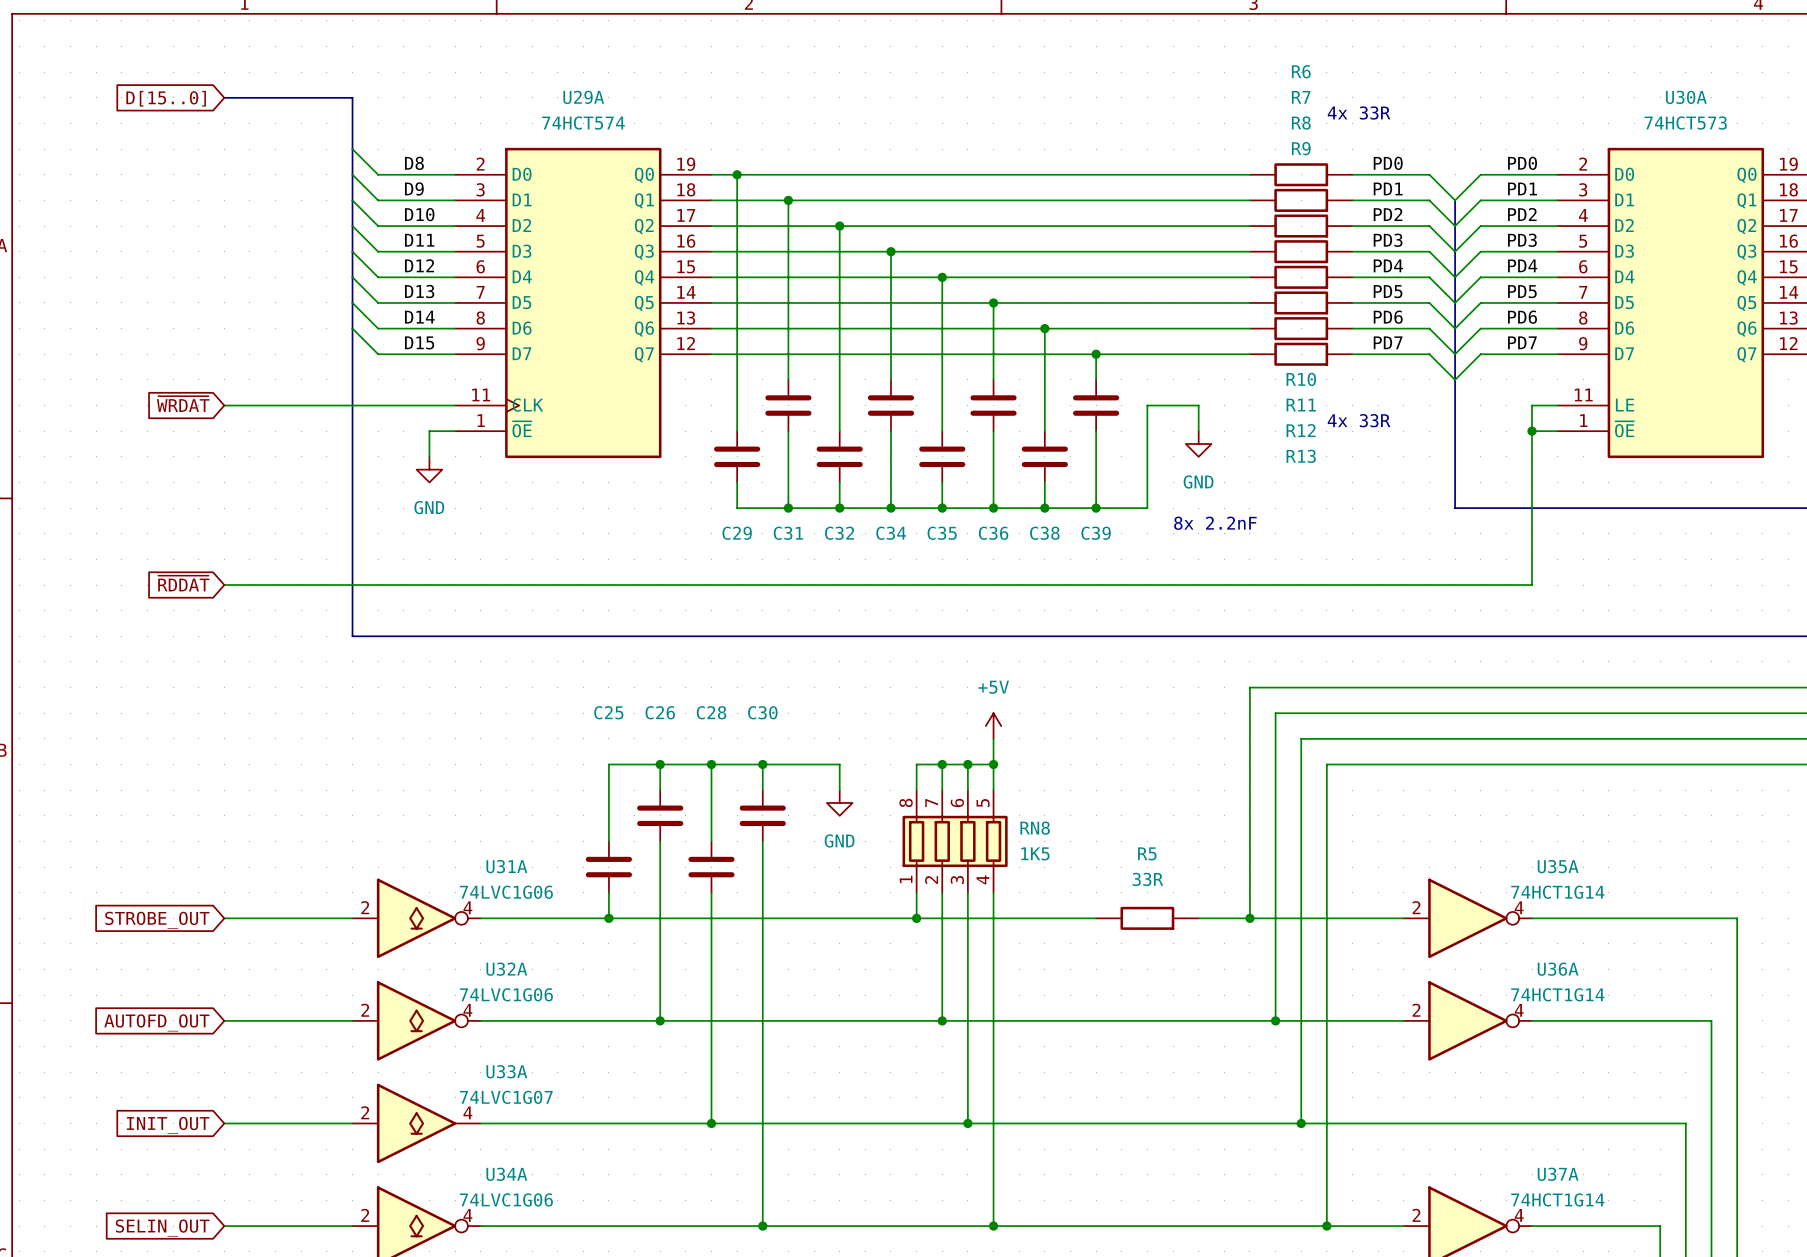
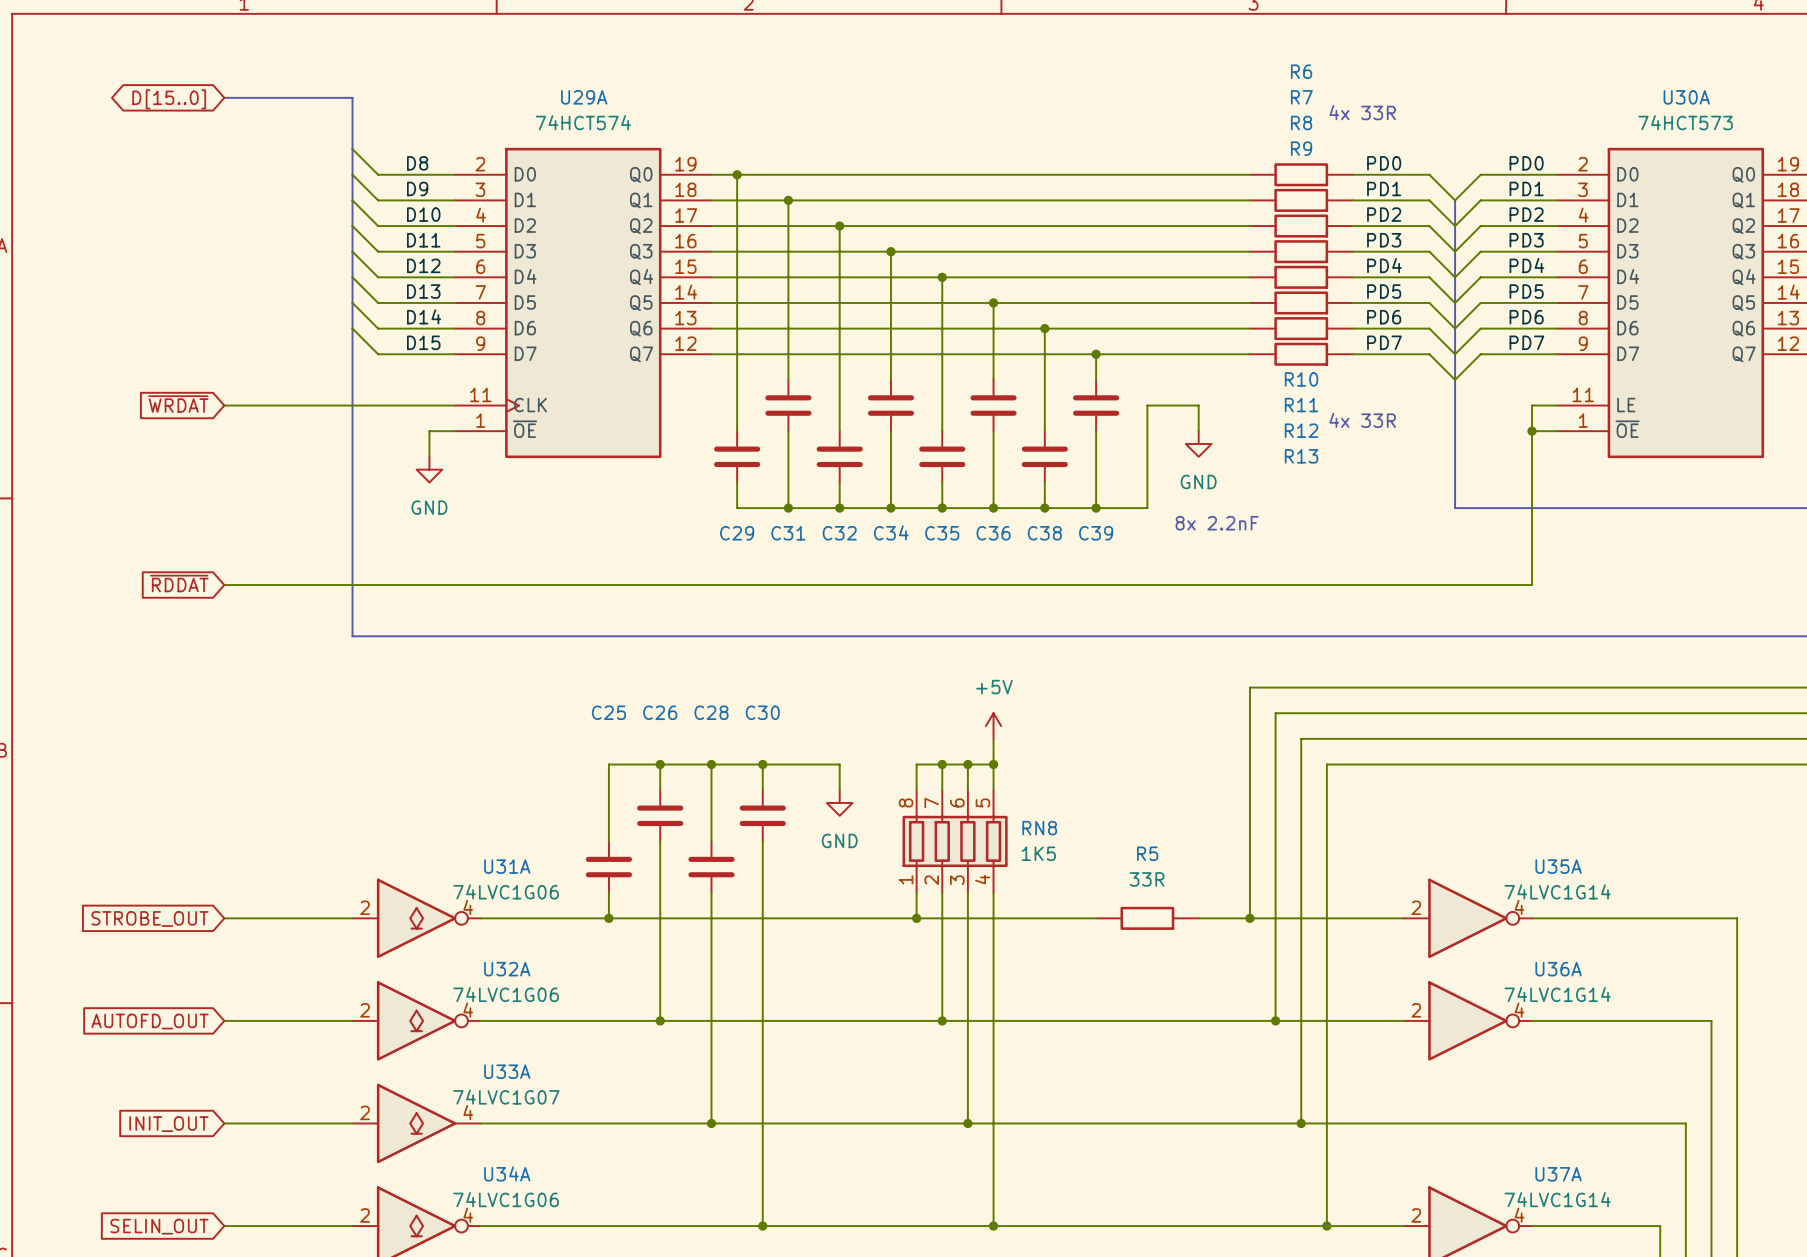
global label shape: input (166, 98) -> bidirectional (169, 99)
U35A value: 74HCT1G14 (1557, 892) -> 74LVC1G14 (1557, 891)
U36A value: 74HCT1G14 (1557, 994) -> 74LVC1G14 (1557, 994)
U37A value: 74HCT1G14 (1557, 1199) -> 74LVC1G14 (1557, 1199)

